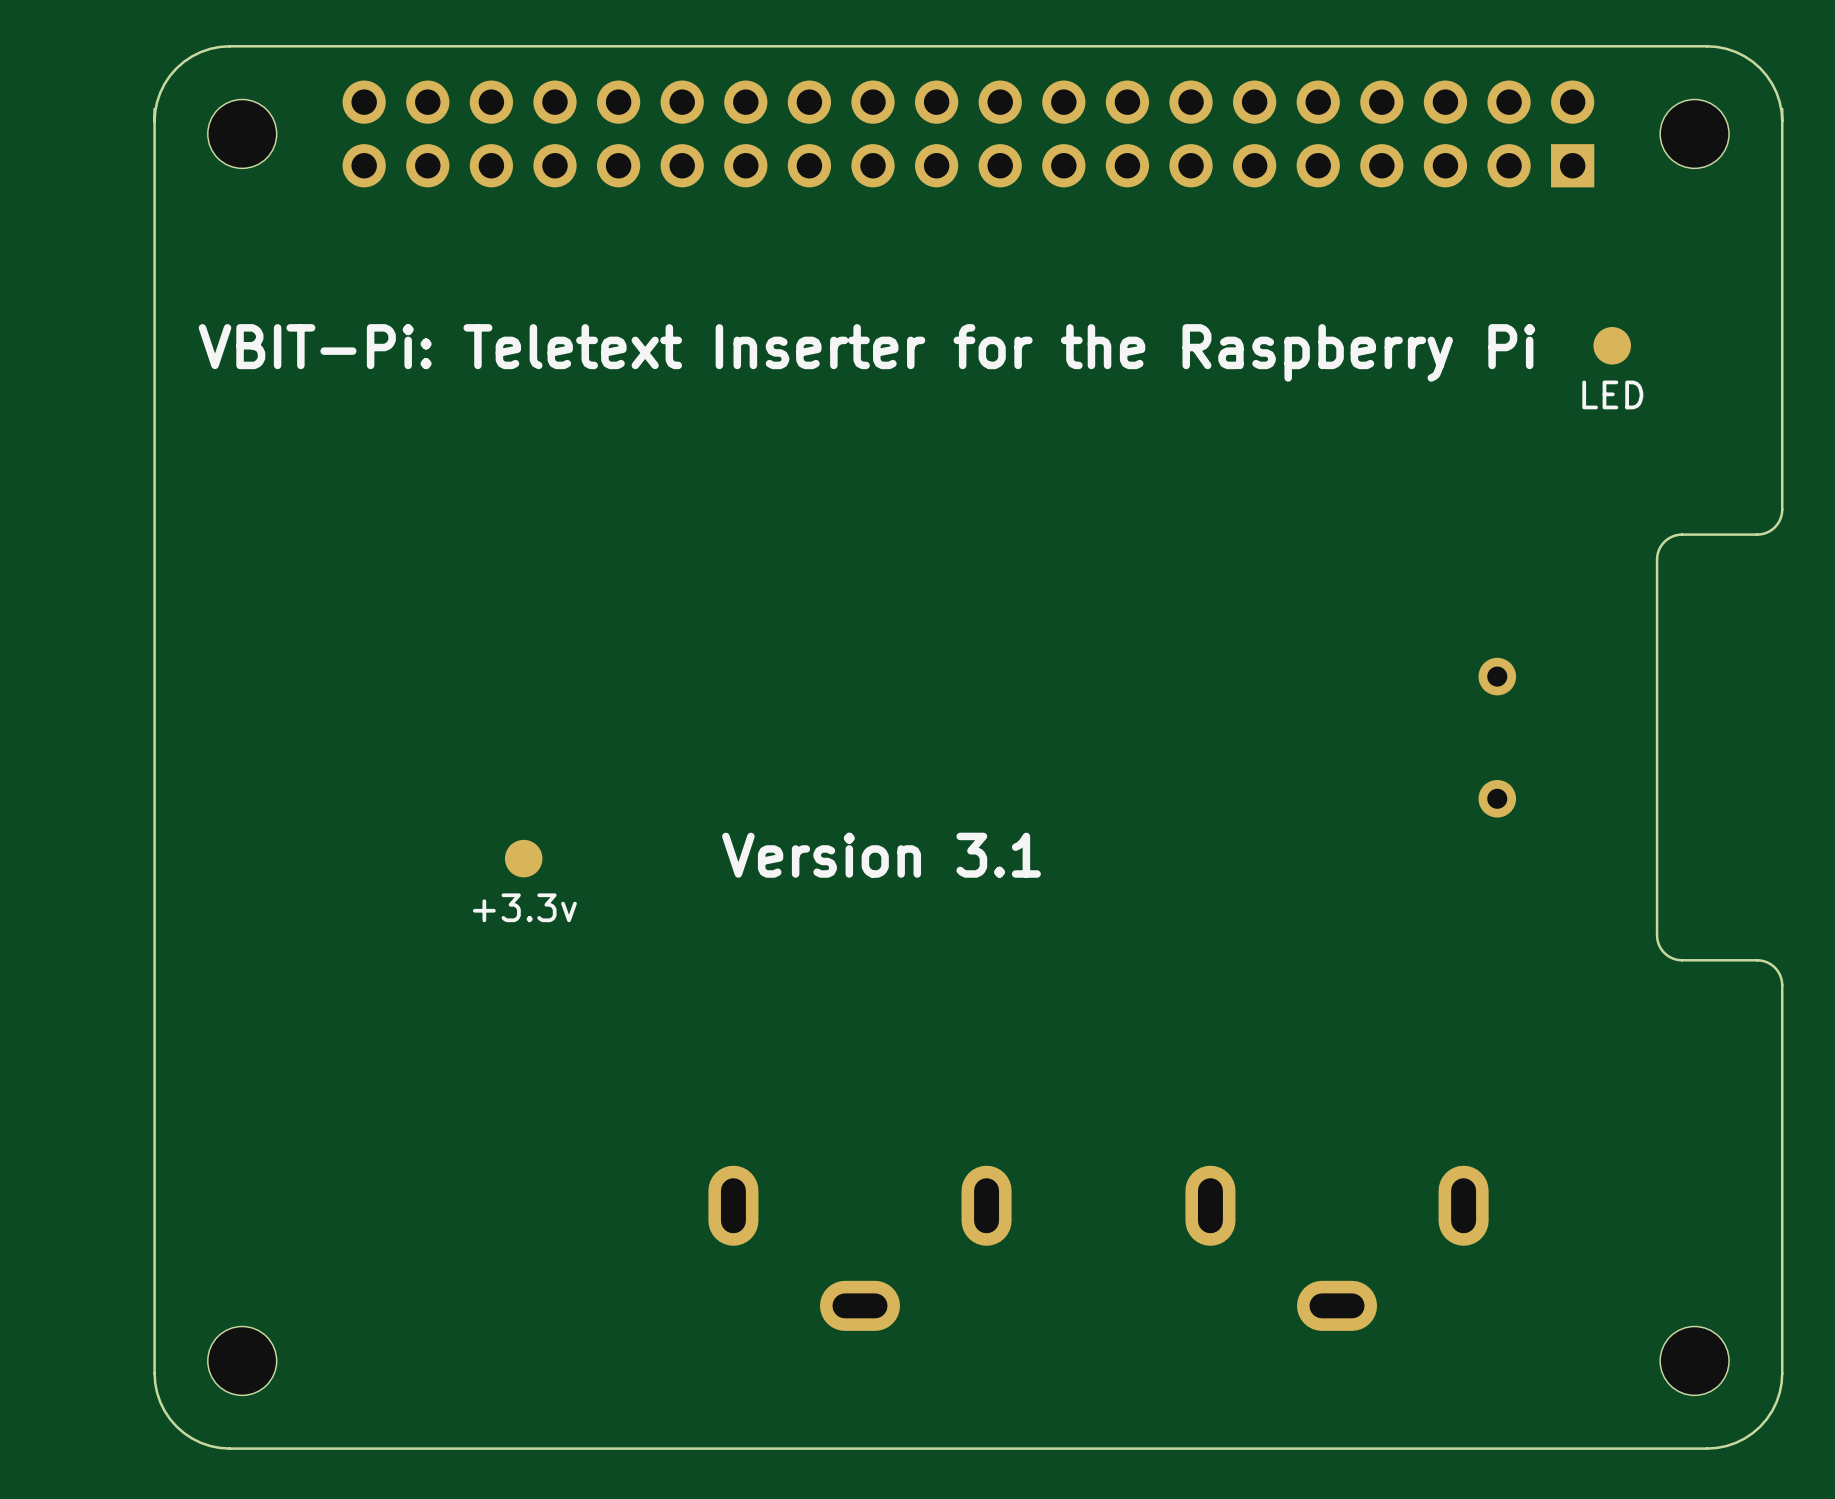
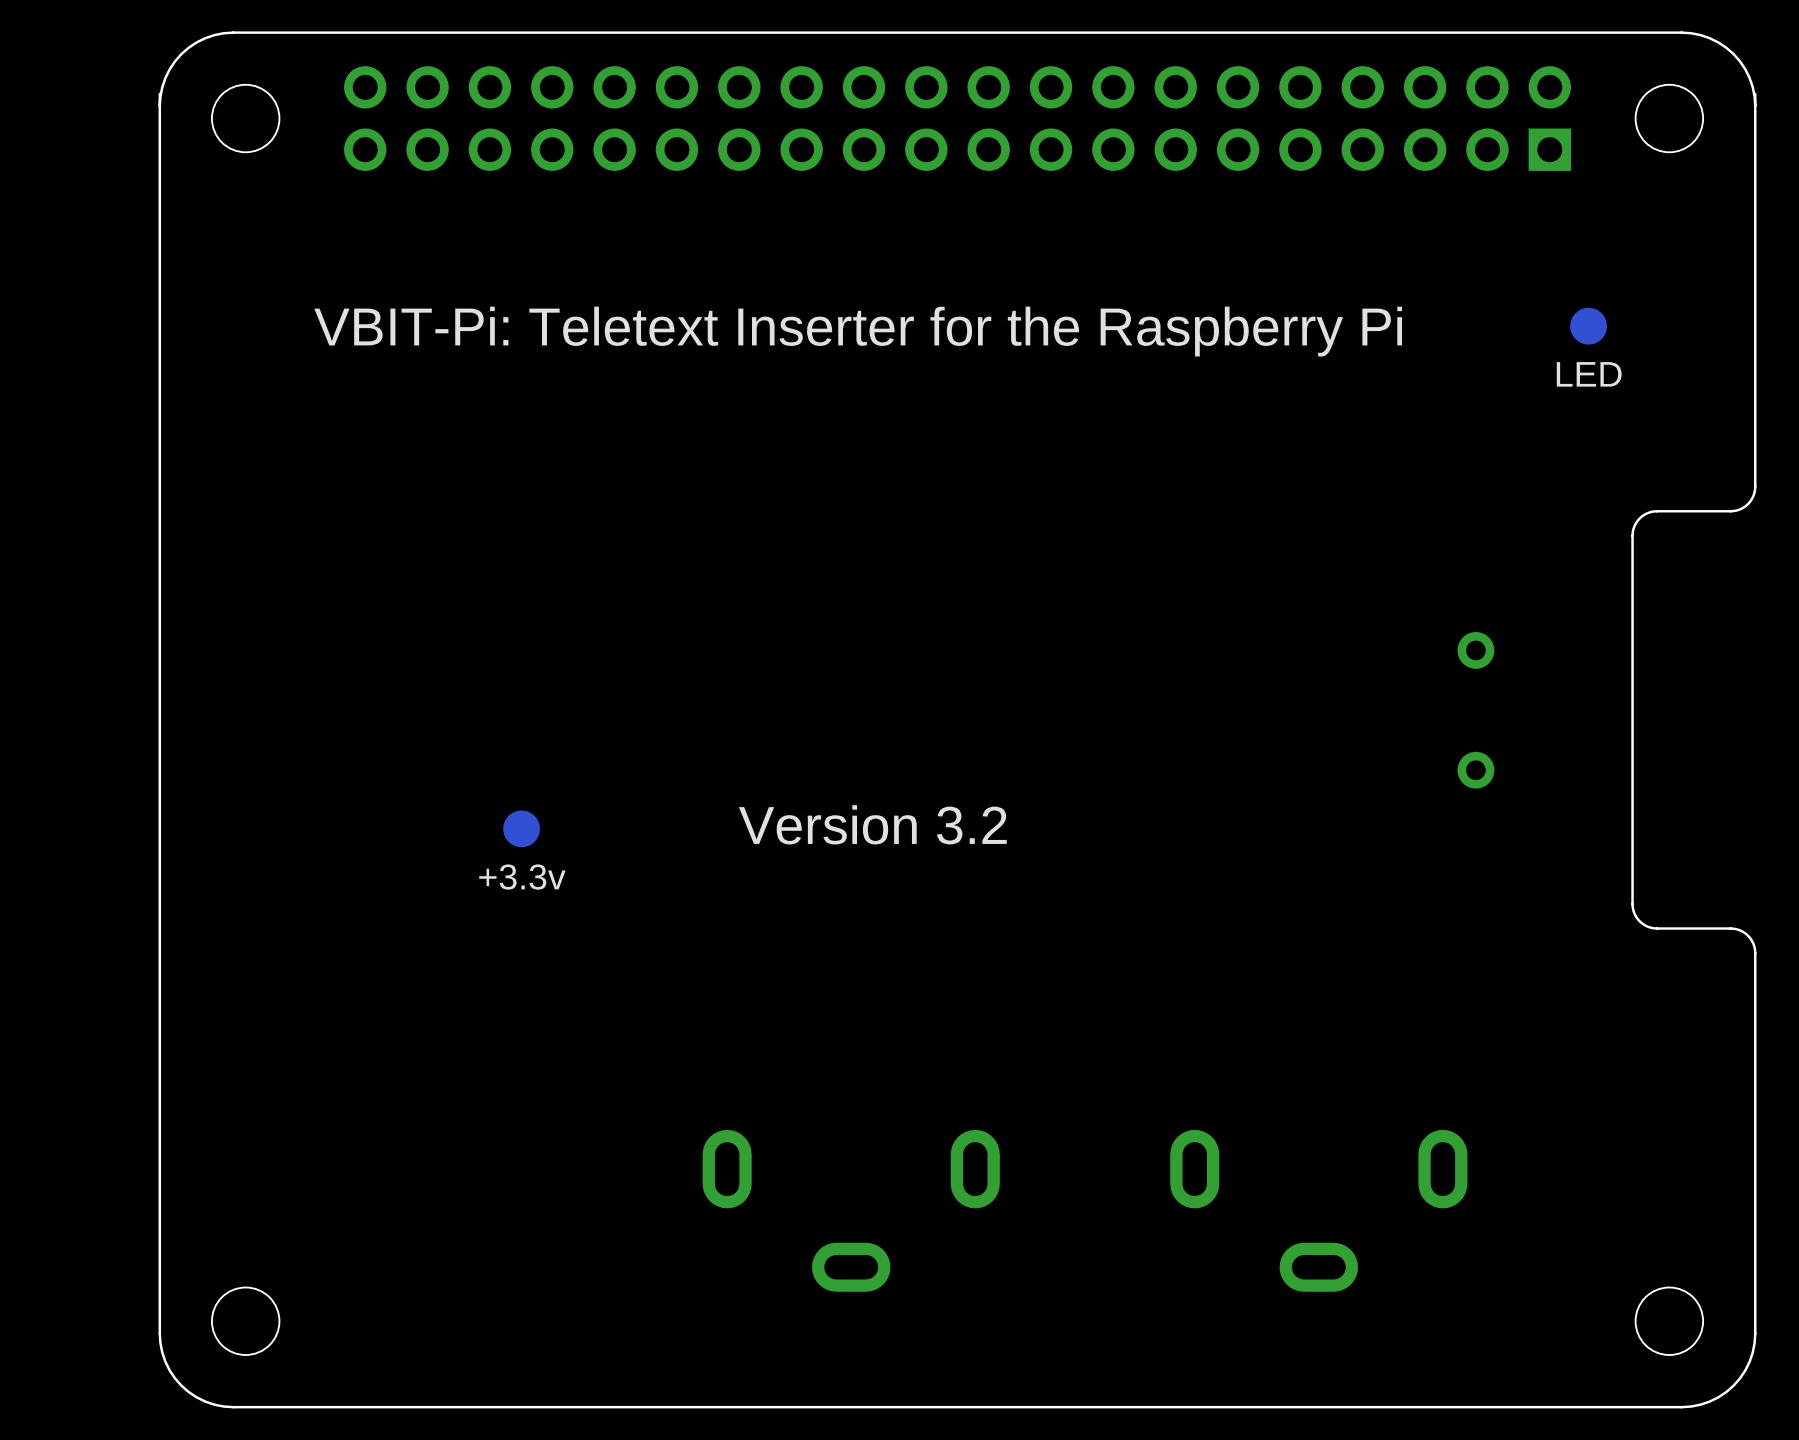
text: Version 3.1 (881, 855) -> Version 3.2 (872, 824)

